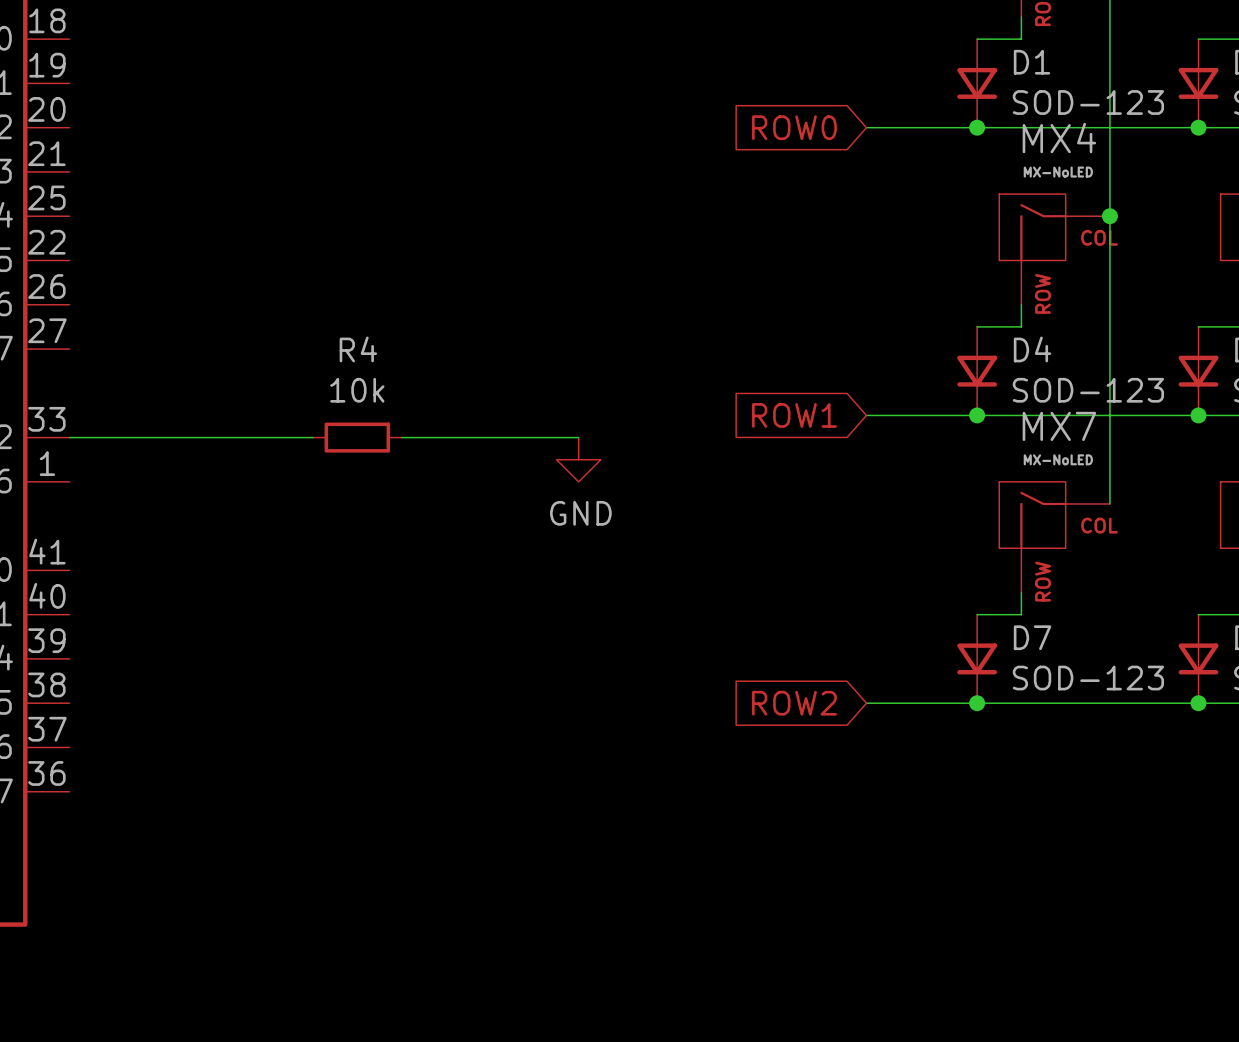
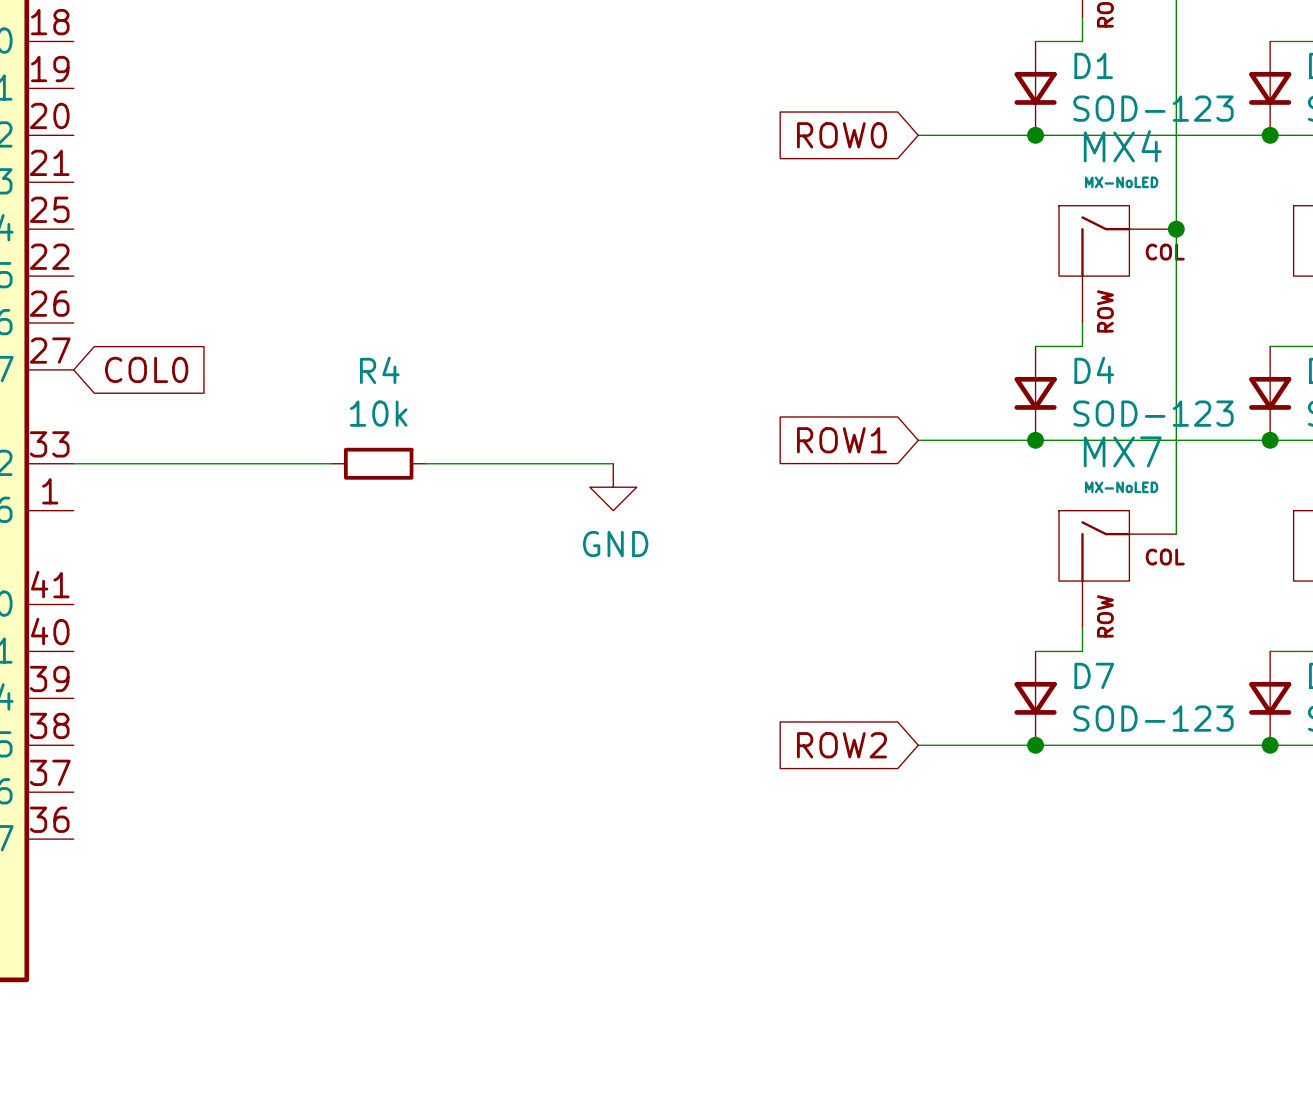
global label: none -> COL0 (146, 369)

